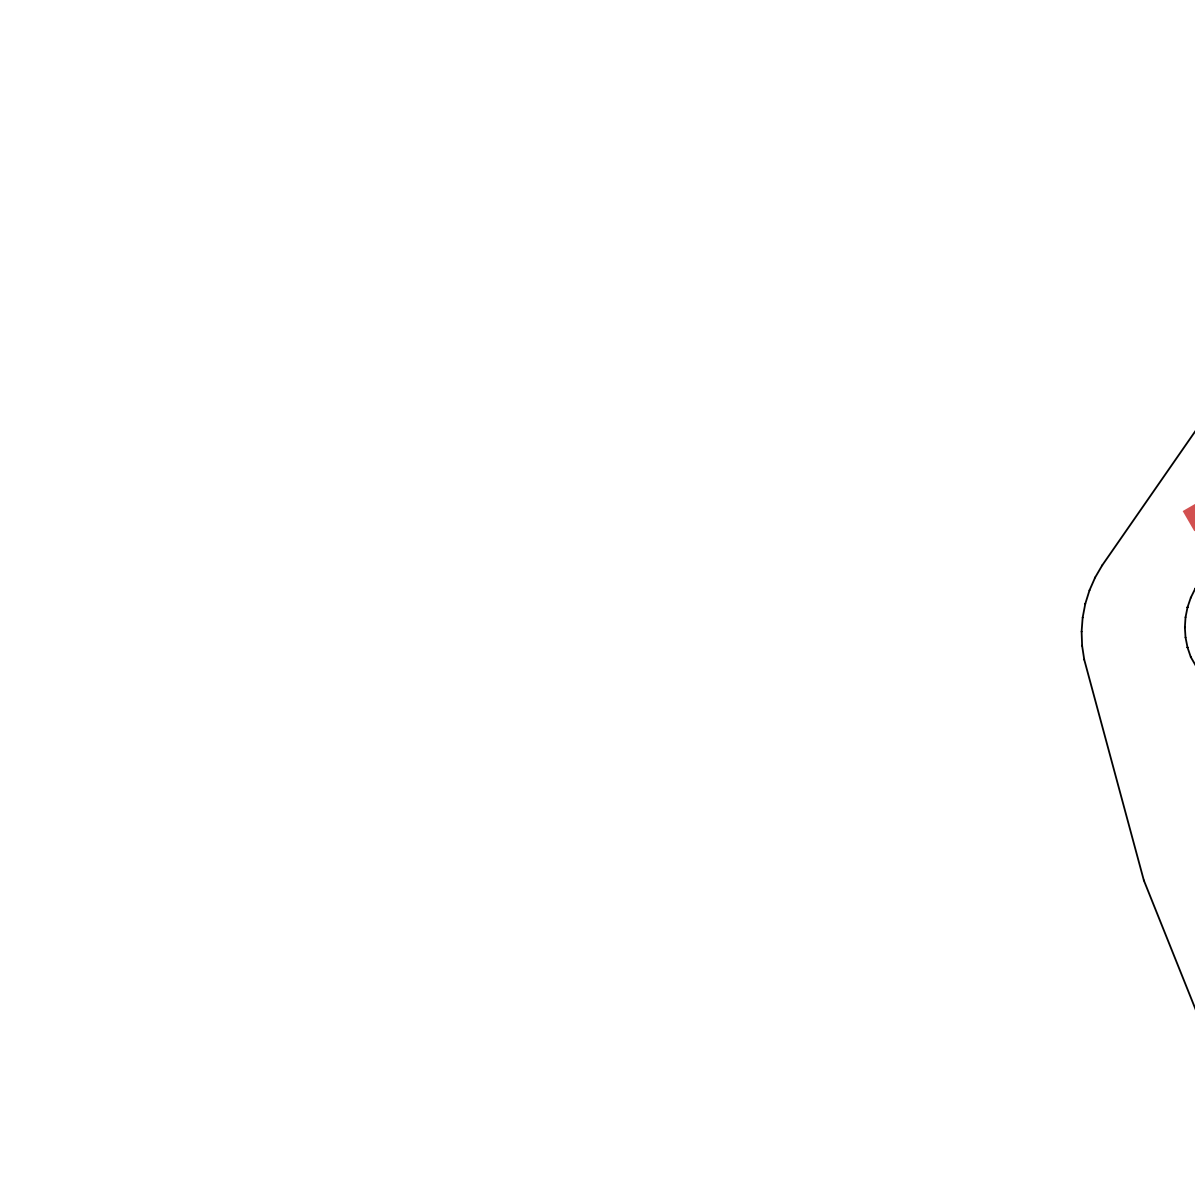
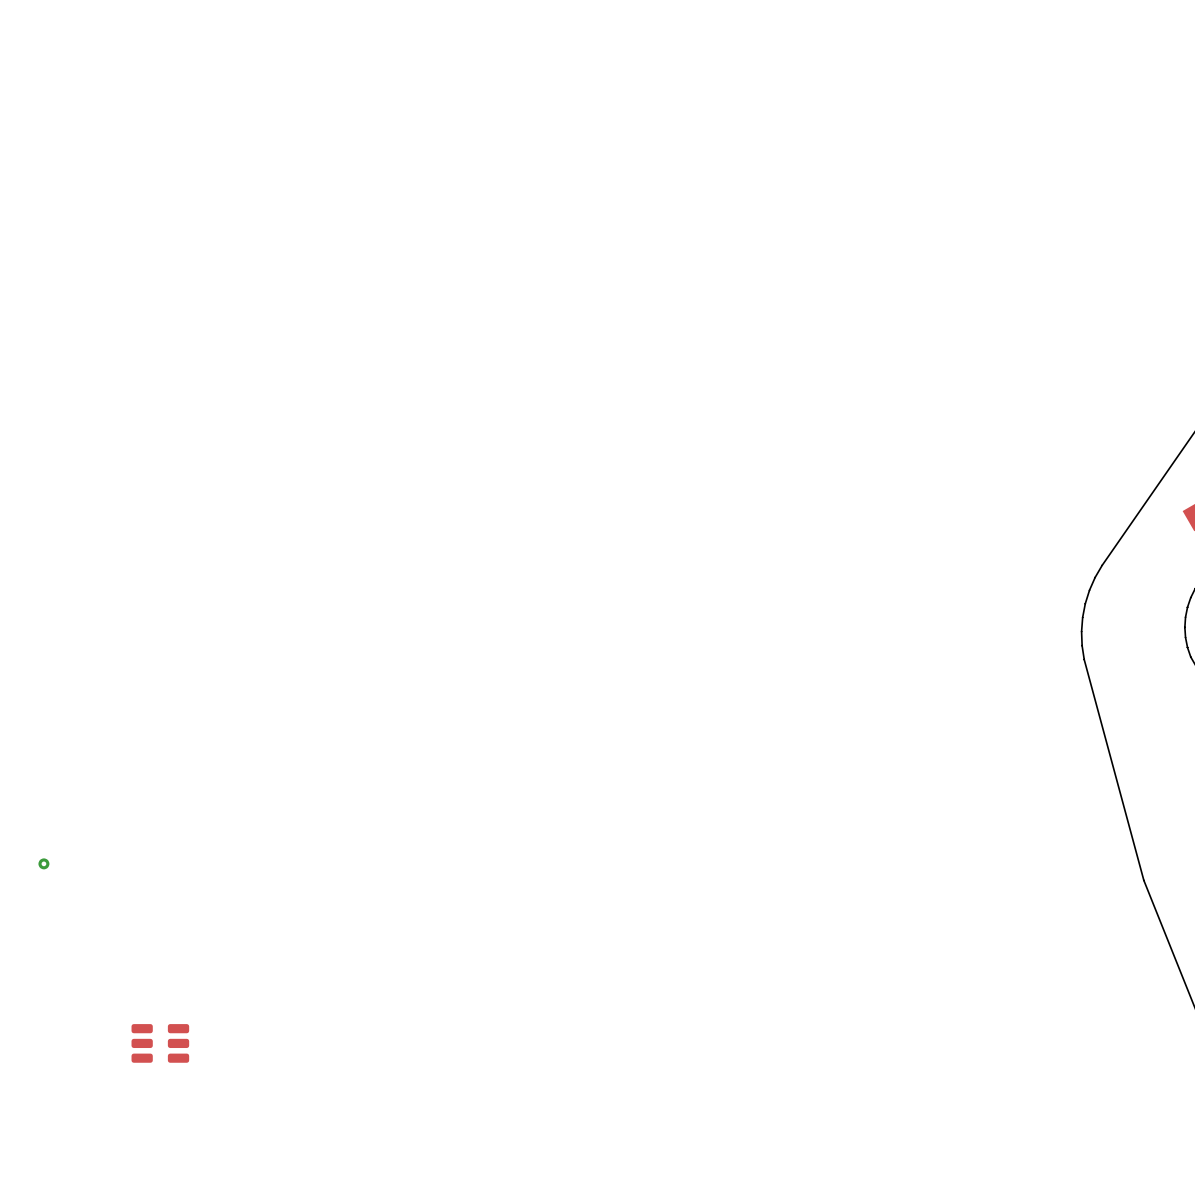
via: none -> (43, 863)
part: none -> (160, 1043)

